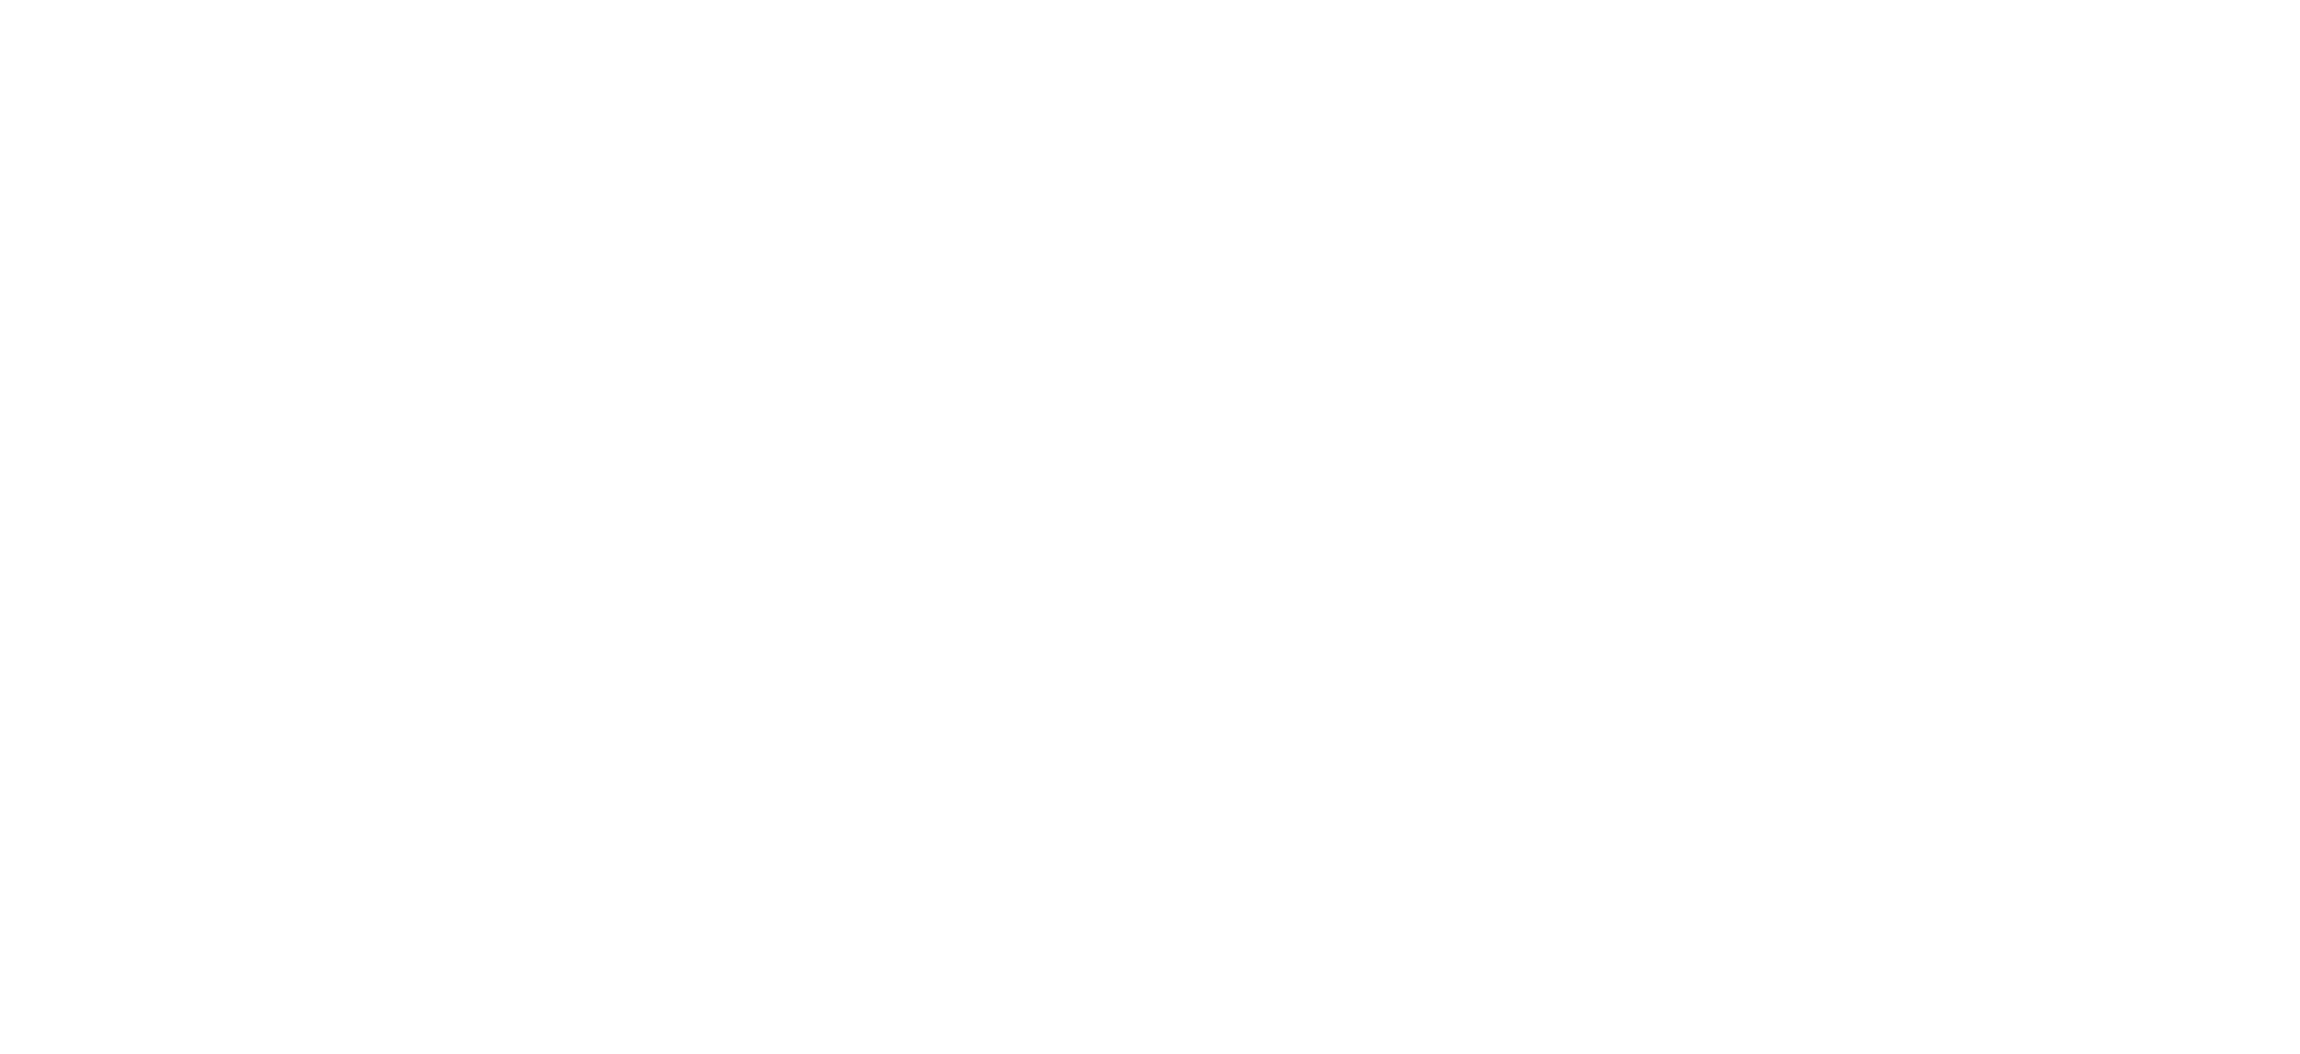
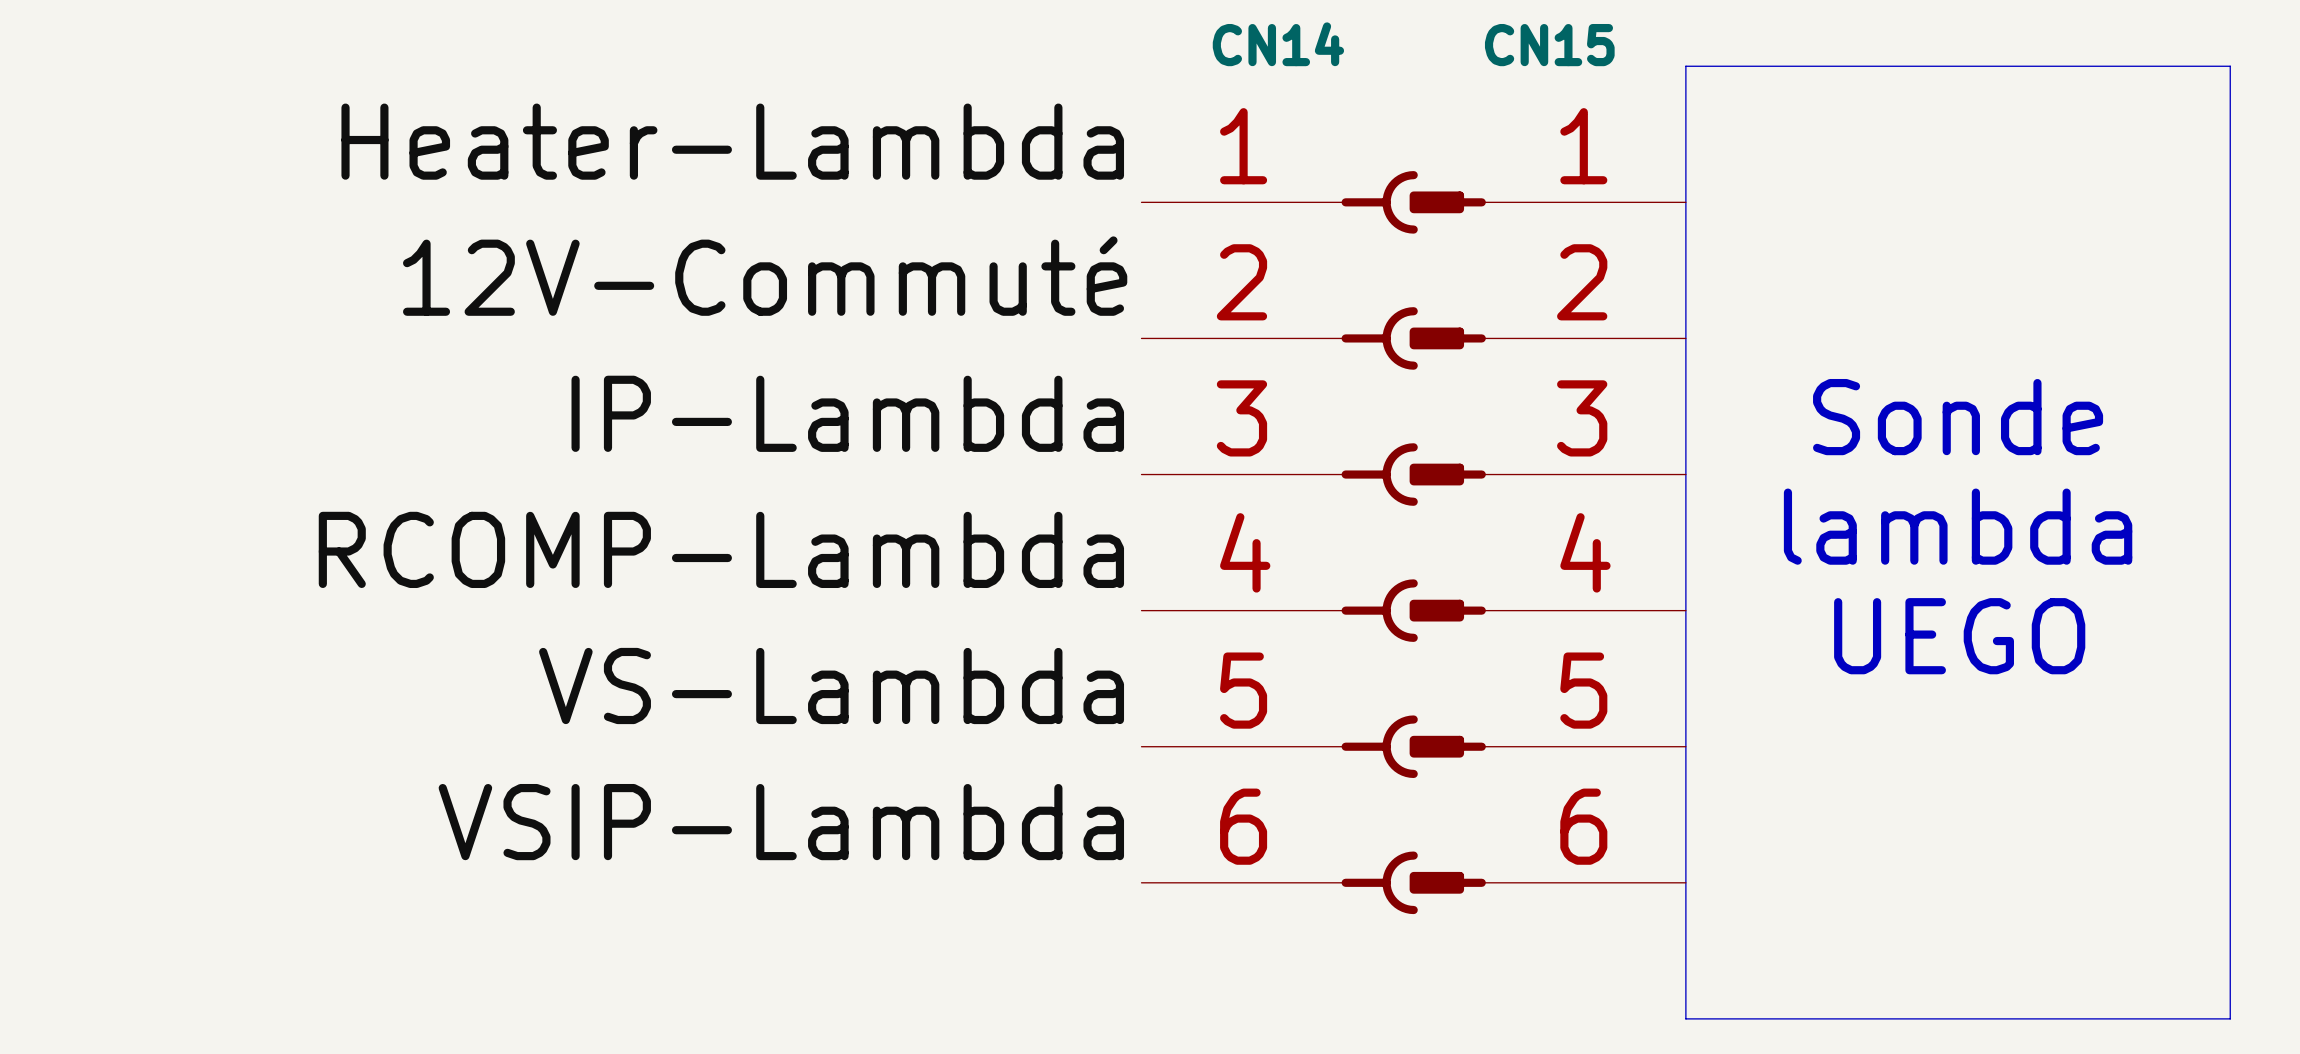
line: none -> (1685, 66) (2230, 66) (2230, 1018) (1685, 1018) (1685, 66)
label: none -> Heater-Lambda (732, 141)
label: none -> 12V-Commuté (765, 276)
label: none -> IP-Lambda (847, 413)
text: none -> Sonde (1958, 417)
text: none -> lambda (1958, 526)
CN14: none -> (1279, 542)
CN15: none -> (1547, 542)
label: none -> RCOMP-Lambda (721, 549)
text: none -> UEGO (1959, 636)
label: none -> VS-Lambda (831, 685)
label: none -> VSIP-Lambda (781, 822)

